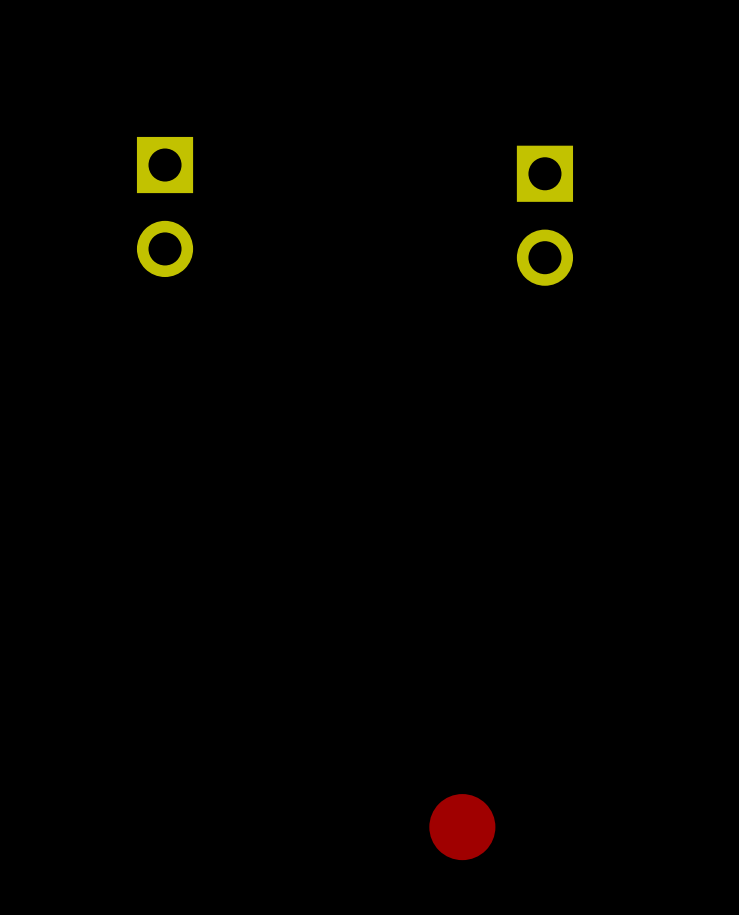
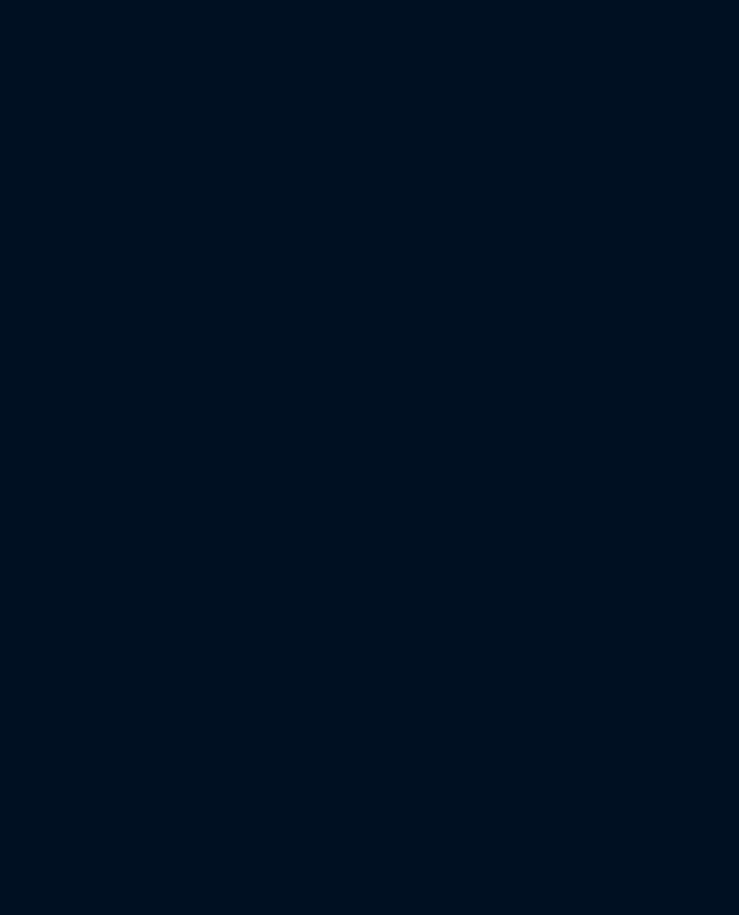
part: (165, 206) -> none
part: (544, 215) -> none
part: (462, 827) -> none

